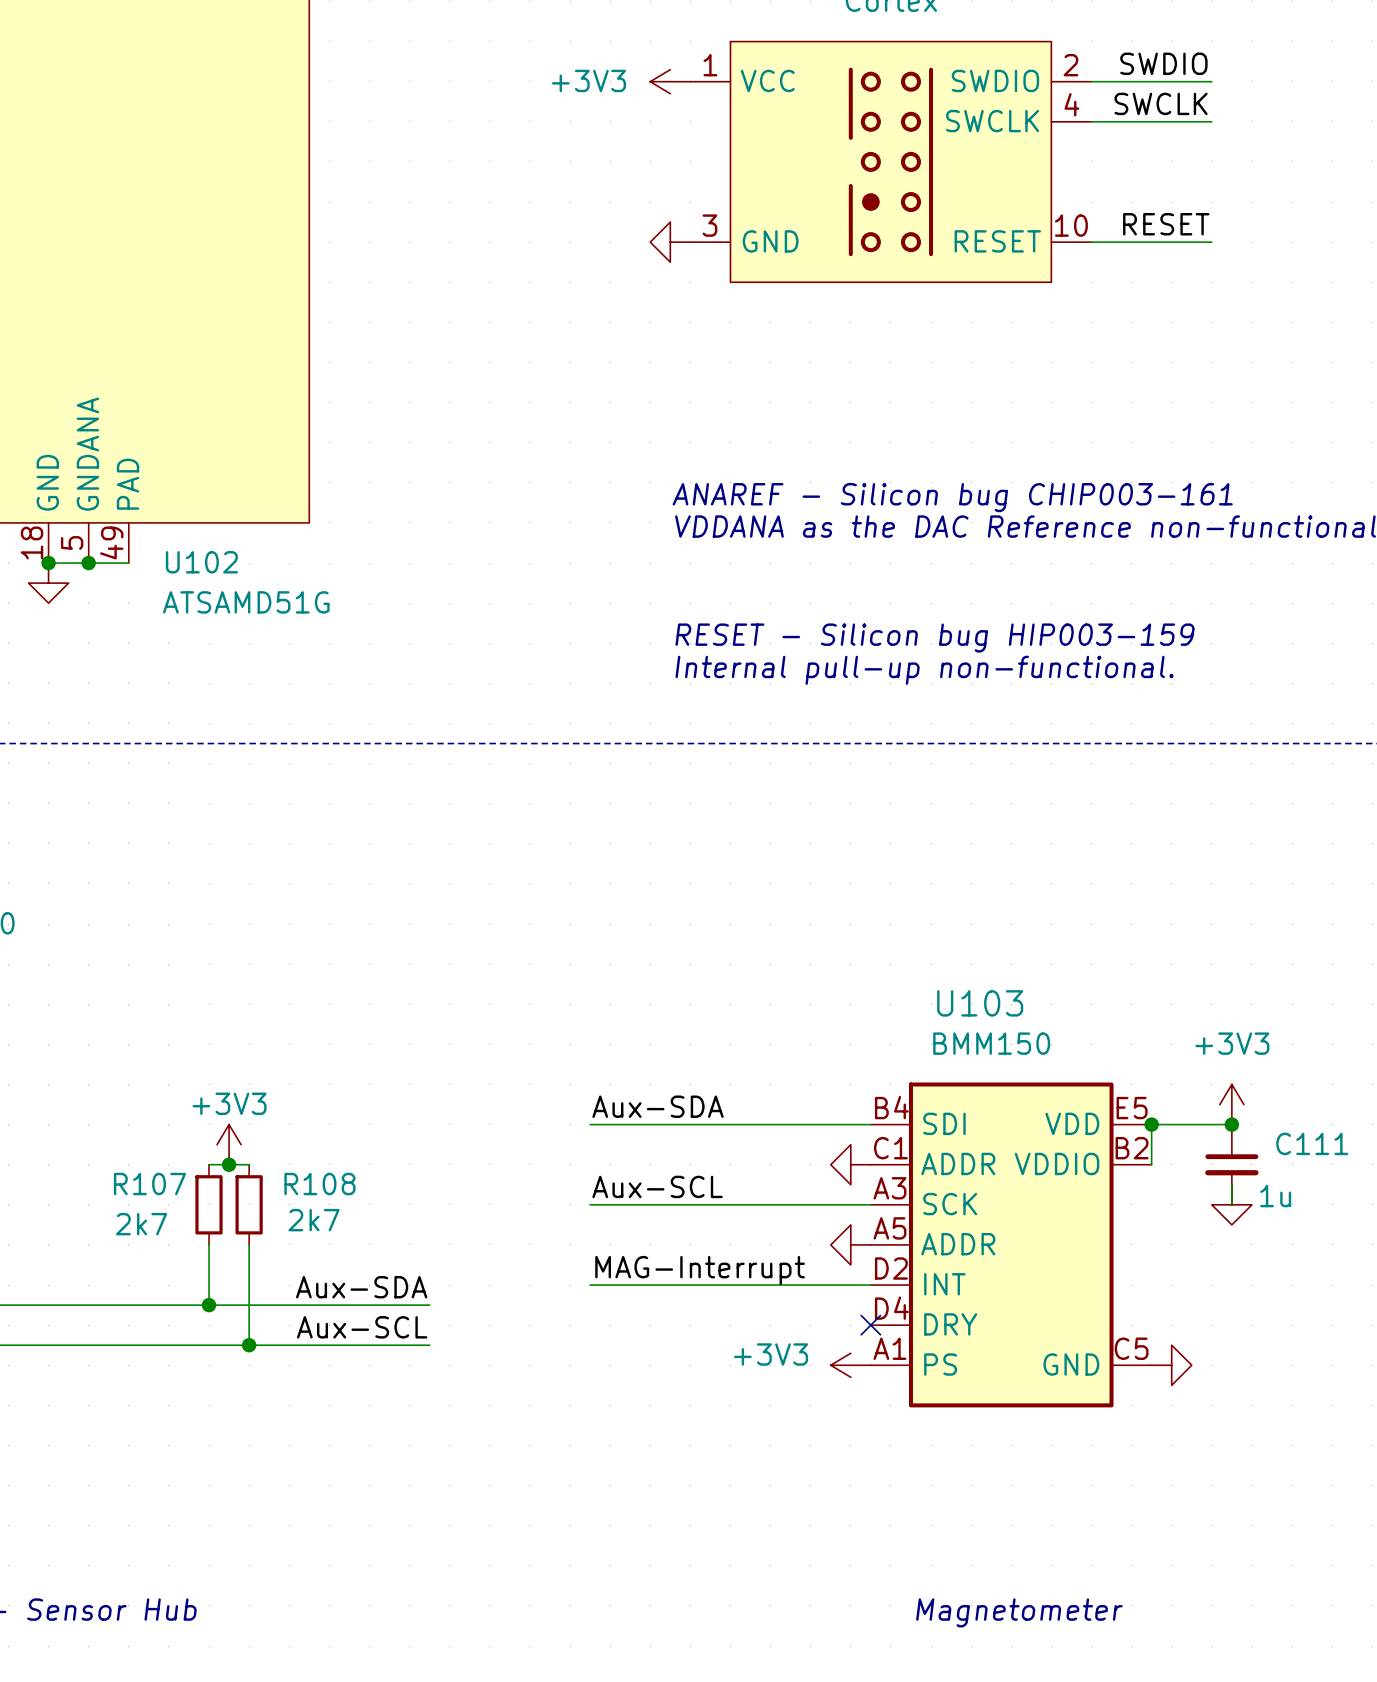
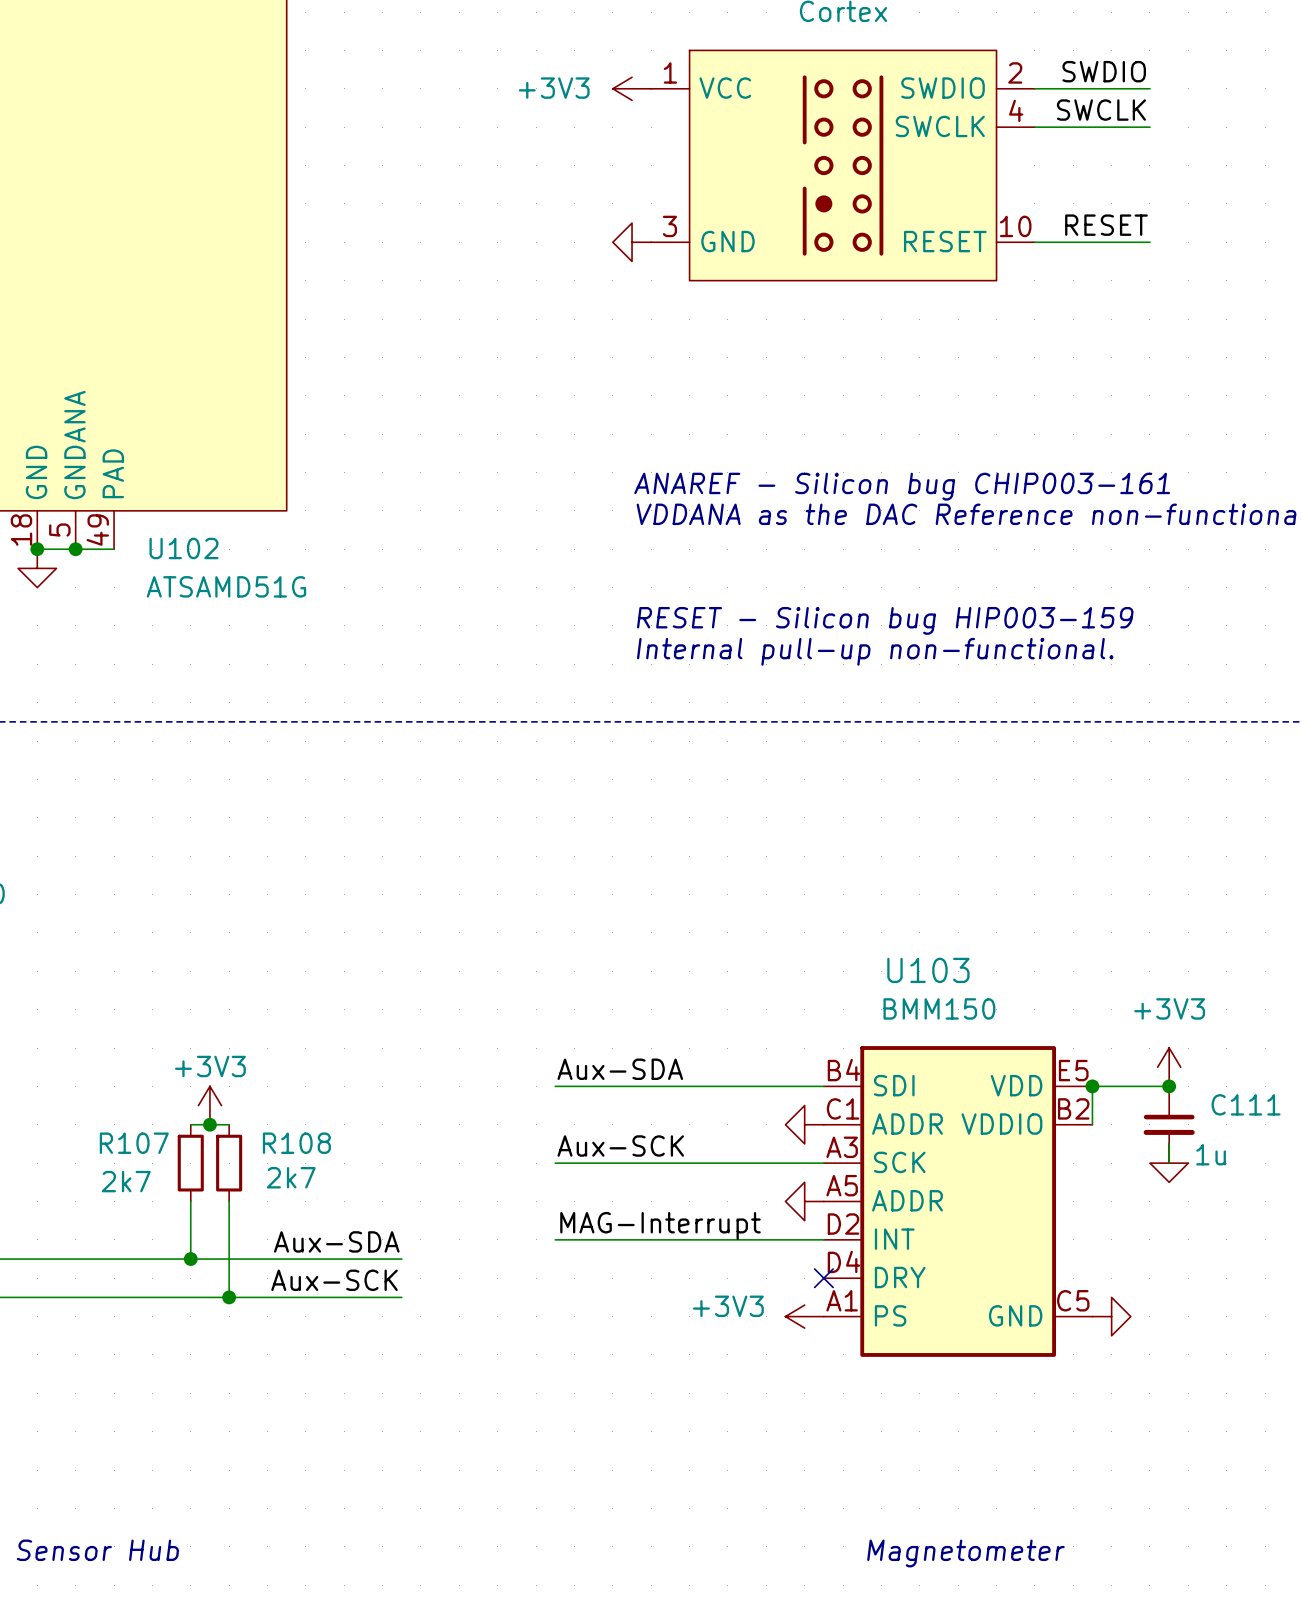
label: Aux-SCL (657, 1186) -> Aux-SCK (620, 1146)
label: Aux-SCL (362, 1327) -> Aux-SCK (334, 1280)

